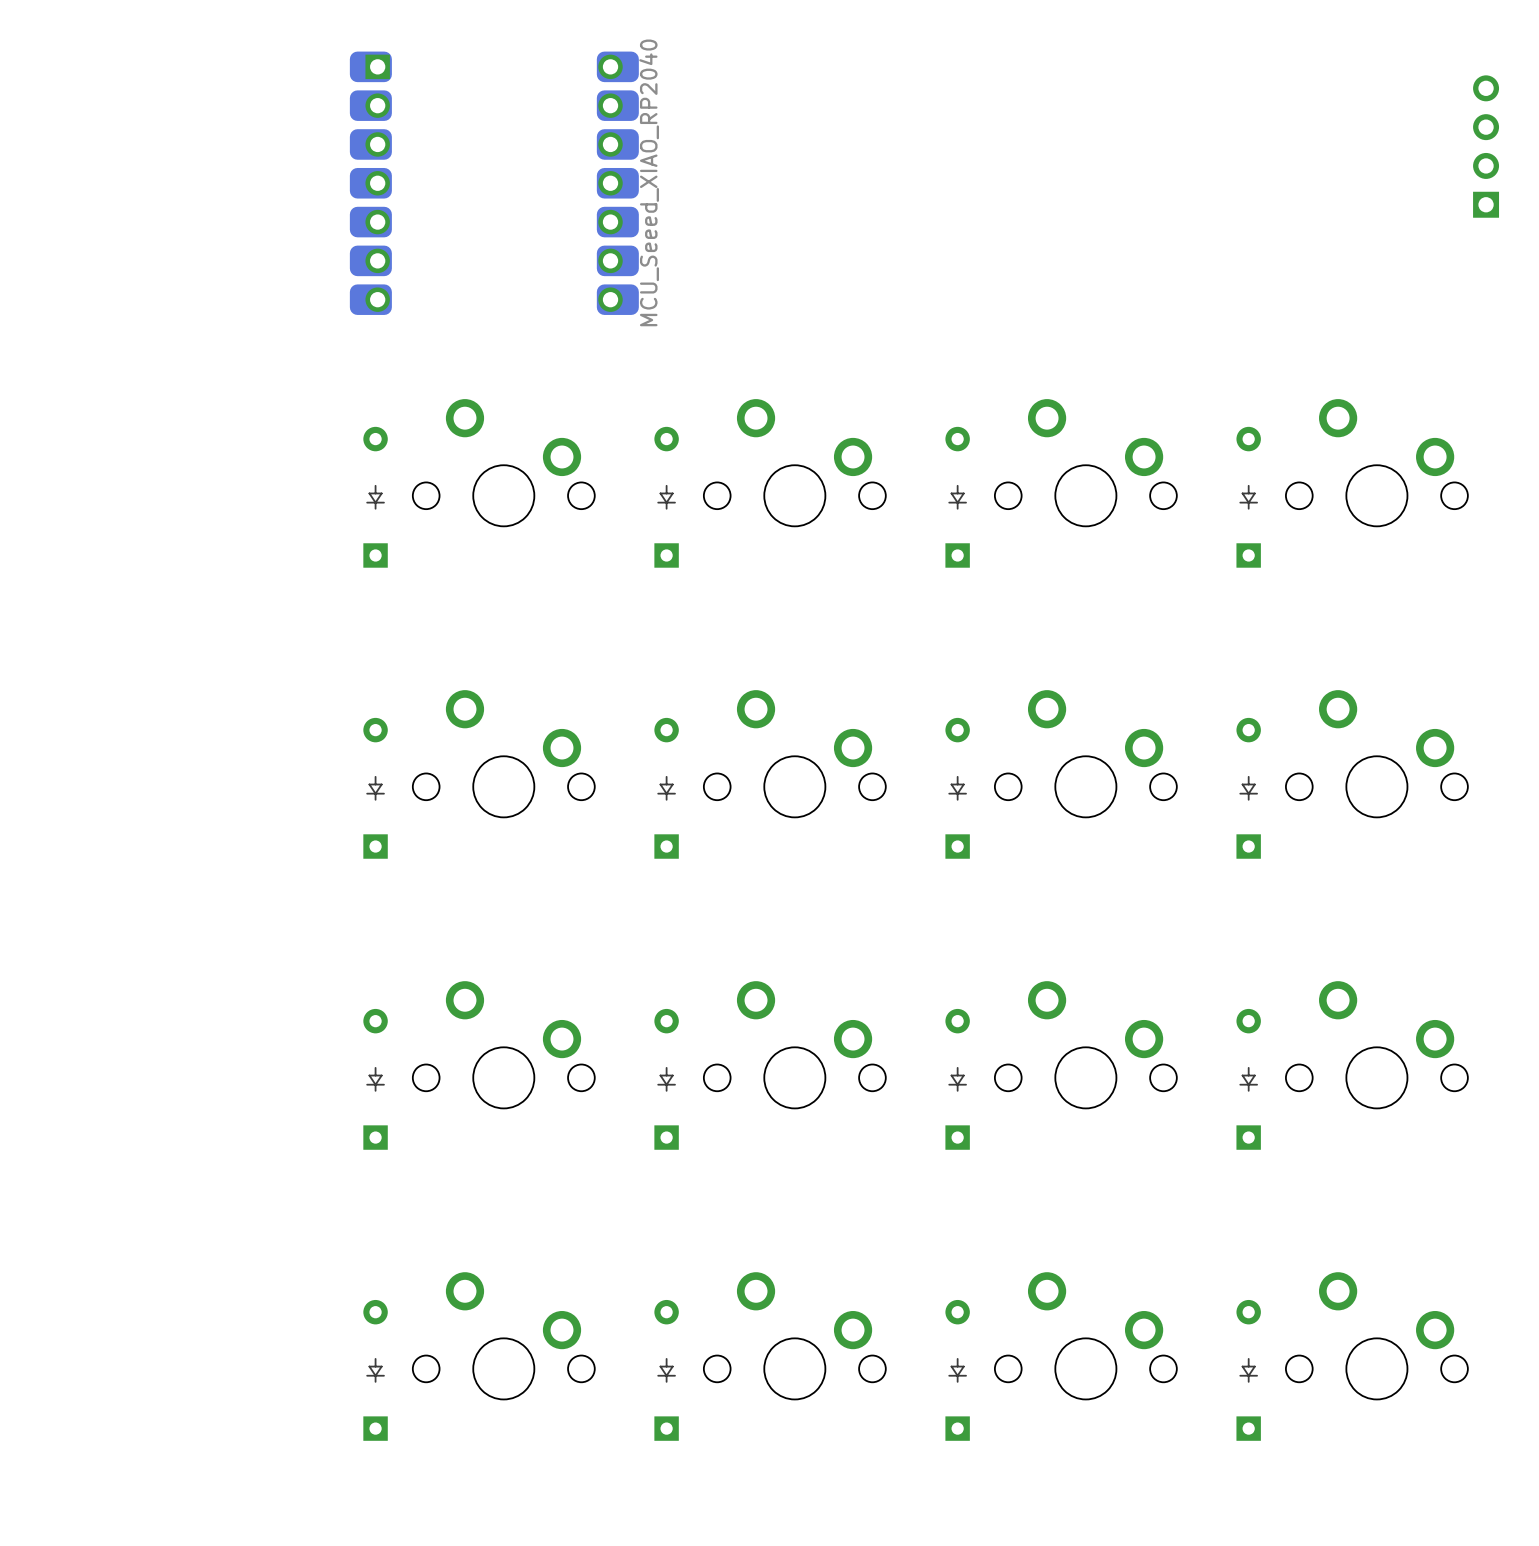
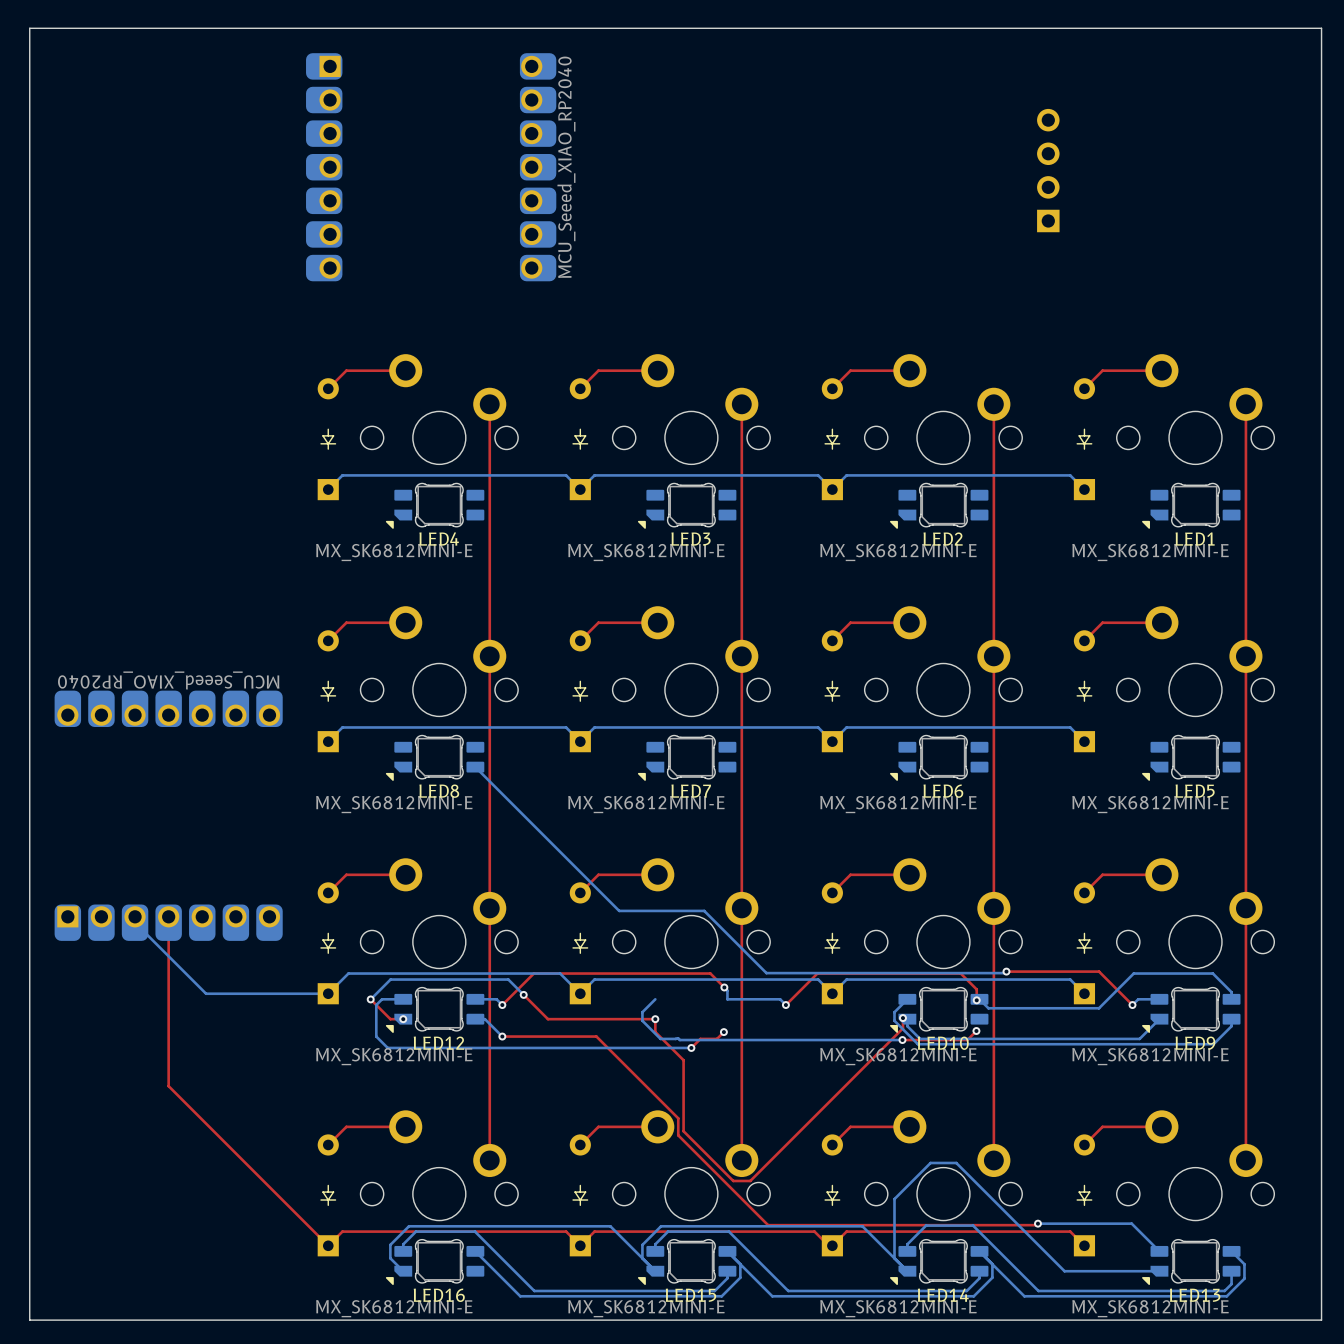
board edge: none -> (1321, 28) (29, 28) (29, 1320) (1321, 1320) (1321, 28)
part position: (1486, 146) -> (1048, 170)
top track: none -> (405, 370) (346, 370) (328, 388)
top track: none -> (657, 370) (598, 370) (580, 388)
top track: none -> (909, 370) (850, 370) (832, 388)
top track: none -> (1161, 370) (1102, 370) (1084, 388)
top track: none -> (489, 404) (489, 1160)
top track: none -> (741, 404) (741, 1160)
top track: none -> (993, 404) (993, 1160)
top track: none -> (1245, 404) (1245, 1160)
bottom track: none -> (1084, 489) (1070, 475) (846, 475) (832, 489) (818, 475) (594, 475) (580, 489) (566, 475) (342, 475) (328, 489)
LED4: none -> MX_SK6812MINI-E (435, 505)
LED3: none -> MX_SK6812MINI-E (687, 505)
LED2: none -> MX_SK6812MINI-E (939, 505)
LED1: none -> MX_SK6812MINI-E (1191, 505)
top track: none -> (405, 622) (346, 622) (328, 640)
top track: none -> (657, 622) (598, 622) (580, 640)
top track: none -> (909, 622) (850, 622) (832, 640)
top track: none -> (1161, 622) (1102, 622) (1084, 640)
bottom track: none -> (1084, 741) (1070, 727) (846, 727) (832, 741) (818, 727) (594, 727) (580, 741) (566, 727) (342, 727) (328, 741)
LED8: none -> MX_SK6812MINI-E (435, 757)
LED7: none -> MX_SK6812MINI-E (687, 757)
LED6: none -> MX_SK6812MINI-E (939, 757)
LED5: none -> MX_SK6812MINI-E (1191, 757)
bottom track: none -> (475, 767) (619, 910) (704, 910) (766, 973) (1004, 973) (1006, 971)
part: none -> MCU_Seeed_XIAO_RP2040 (168, 815)
top track: none -> (405, 874) (346, 874) (328, 892)
top track: none -> (657, 874) (598, 874) (580, 892)
top track: none -> (909, 874) (850, 874) (832, 892)
top track: none -> (1161, 874) (1102, 874) (1084, 892)
top track: none -> (168, 916) (168, 1086) (328, 1245) (342, 1231) (566, 1231) (580, 1245) (594, 1231) (814, 1231) (828, 1245) (832, 1245) (846, 1231) (1070, 1231) (1084, 1245)
bottom track: none -> (135, 922) (206, 993) (328, 993) (348, 973) (560, 973) (580, 993) (594, 979) (818, 979) (832, 993) (846, 979) (1070, 979) (1084, 993)
top track: none -> (1006, 971) (1099, 971) (1132, 1005)
via: none -> (1006, 971)
bottom track: none -> (724, 987) (727, 990) (727, 999) (780, 999) (785, 1005)
top track: none -> (724, 987) (710, 973) (533, 973) (502, 1005)
via: none -> (724, 987)
bottom track: none -> (523, 994) (508, 979) (390, 979) (370, 999)
top track: none -> (523, 994) (547, 1019) (655, 1019) (655, 1032) (683, 1060) (683, 1131) (733, 1180) (750, 1180) (902, 1028) (902, 1018)
via: none -> (523, 994)
top track: none -> (370, 999) (390, 1019) (403, 1019)
via: none -> (370, 999)
bottom track: none -> (403, 999) (382, 999) (376, 1005) (376, 1036) (387, 1047) (691, 1047)
bottom track: none -> (475, 999) (496, 999) (502, 1005)
bottom track: none -> (655, 999) (642, 1012) (642, 1020) (660, 1038) (902, 1040)
bottom track: none -> (912, 999) (907, 999) (894, 1012) (894, 1020) (917, 1044) (1213, 1044) (1231, 1026) (1231, 1019)
bottom track: none -> (1159, 999) (1138, 999) (1132, 1005)
bottom track: none -> (1231, 999) (1231, 992) (1212, 973) (1133, 973) (1099, 1008) (988, 1008) (979, 999) (976, 1000)
top track: none -> (976, 1000) (976, 989) (960, 973) (817, 973) (785, 1005)
via: none -> (976, 1000)
via: none -> (502, 1005)
via: none -> (785, 1005)
via: none -> (1132, 1005)
LED12: none -> MX_SK6812MINI-E (435, 1009)
LED10: none -> MX_SK6812MINI-E (939, 1009)
LED9: none -> MX_SK6812MINI-E (1191, 1009)
bottom track: none -> (902, 1018) (907, 1019) (907, 1026) (920, 1038) (1139, 1038) (1159, 1019)
via: none -> (902, 1018)
via: none -> (403, 1019)
bottom track: none -> (475, 1019) (484, 1019) (502, 1036)
via: none -> (655, 1019)
top track: none -> (976, 1030) (967, 1040) (902, 1040)
via: none -> (976, 1030)
top track: none -> (723, 1032) (717, 1038) (700, 1038) (691, 1047)
via: none -> (723, 1032)
top track: none -> (502, 1036) (596, 1036) (678, 1118) (678, 1135) (768, 1225) (1036, 1225) (1037, 1223)
via: none -> (502, 1036)
via: none -> (902, 1040)
via: none -> (691, 1047)
top track: none -> (405, 1126) (346, 1126) (328, 1144)
top track: none -> (657, 1126) (598, 1126) (580, 1144)
top track: none -> (909, 1126) (850, 1126) (832, 1144)
top track: none -> (1161, 1126) (1102, 1126) (1084, 1144)
bottom track: none -> (1037, 1223) (1131, 1223) (1159, 1251)
via: none -> (1037, 1223)
bottom track: none -> (403, 1251) (403, 1244) (415, 1231) (474, 1231) (534, 1290) (714, 1290) (727, 1278) (727, 1271)
bottom track: none -> (475, 1251) (520, 1296) (721, 1296) (740, 1277) (740, 1264)
bottom track: none -> (655, 1251) (655, 1244) (668, 1231) (728, 1231) (788, 1290) (966, 1290) (979, 1278) (979, 1271)
bottom track: none -> (727, 1251) (772, 1296) (973, 1296) (992, 1277) (992, 1264)
bottom track: none -> (907, 1251) (907, 1244) (926, 1225) (973, 1225) (1038, 1290) (1224, 1290) (1231, 1284) (1231, 1271)
bottom track: none -> (1231, 1251) (1244, 1264) (1244, 1278) (1226, 1296) (1024, 1296) (979, 1251)
bottom track: none -> (642, 1258) (642, 1244) (661, 1226) (862, 1226) (907, 1271)
bottom track: none -> (894, 1258) (894, 1199) (930, 1162) (956, 1162) (1064, 1271) (1159, 1271)
LED16: none -> MX_SK6812MINI-E (435, 1261)
LED15: none -> MX_SK6812MINI-E (687, 1261)
LED14: none -> MX_SK6812MINI-E (939, 1261)
LED13: none -> MX_SK6812MINI-E (1191, 1261)
bottom track: none -> (655, 1271) (610, 1226) (408, 1226) (390, 1244) (390, 1258) (403, 1271)

